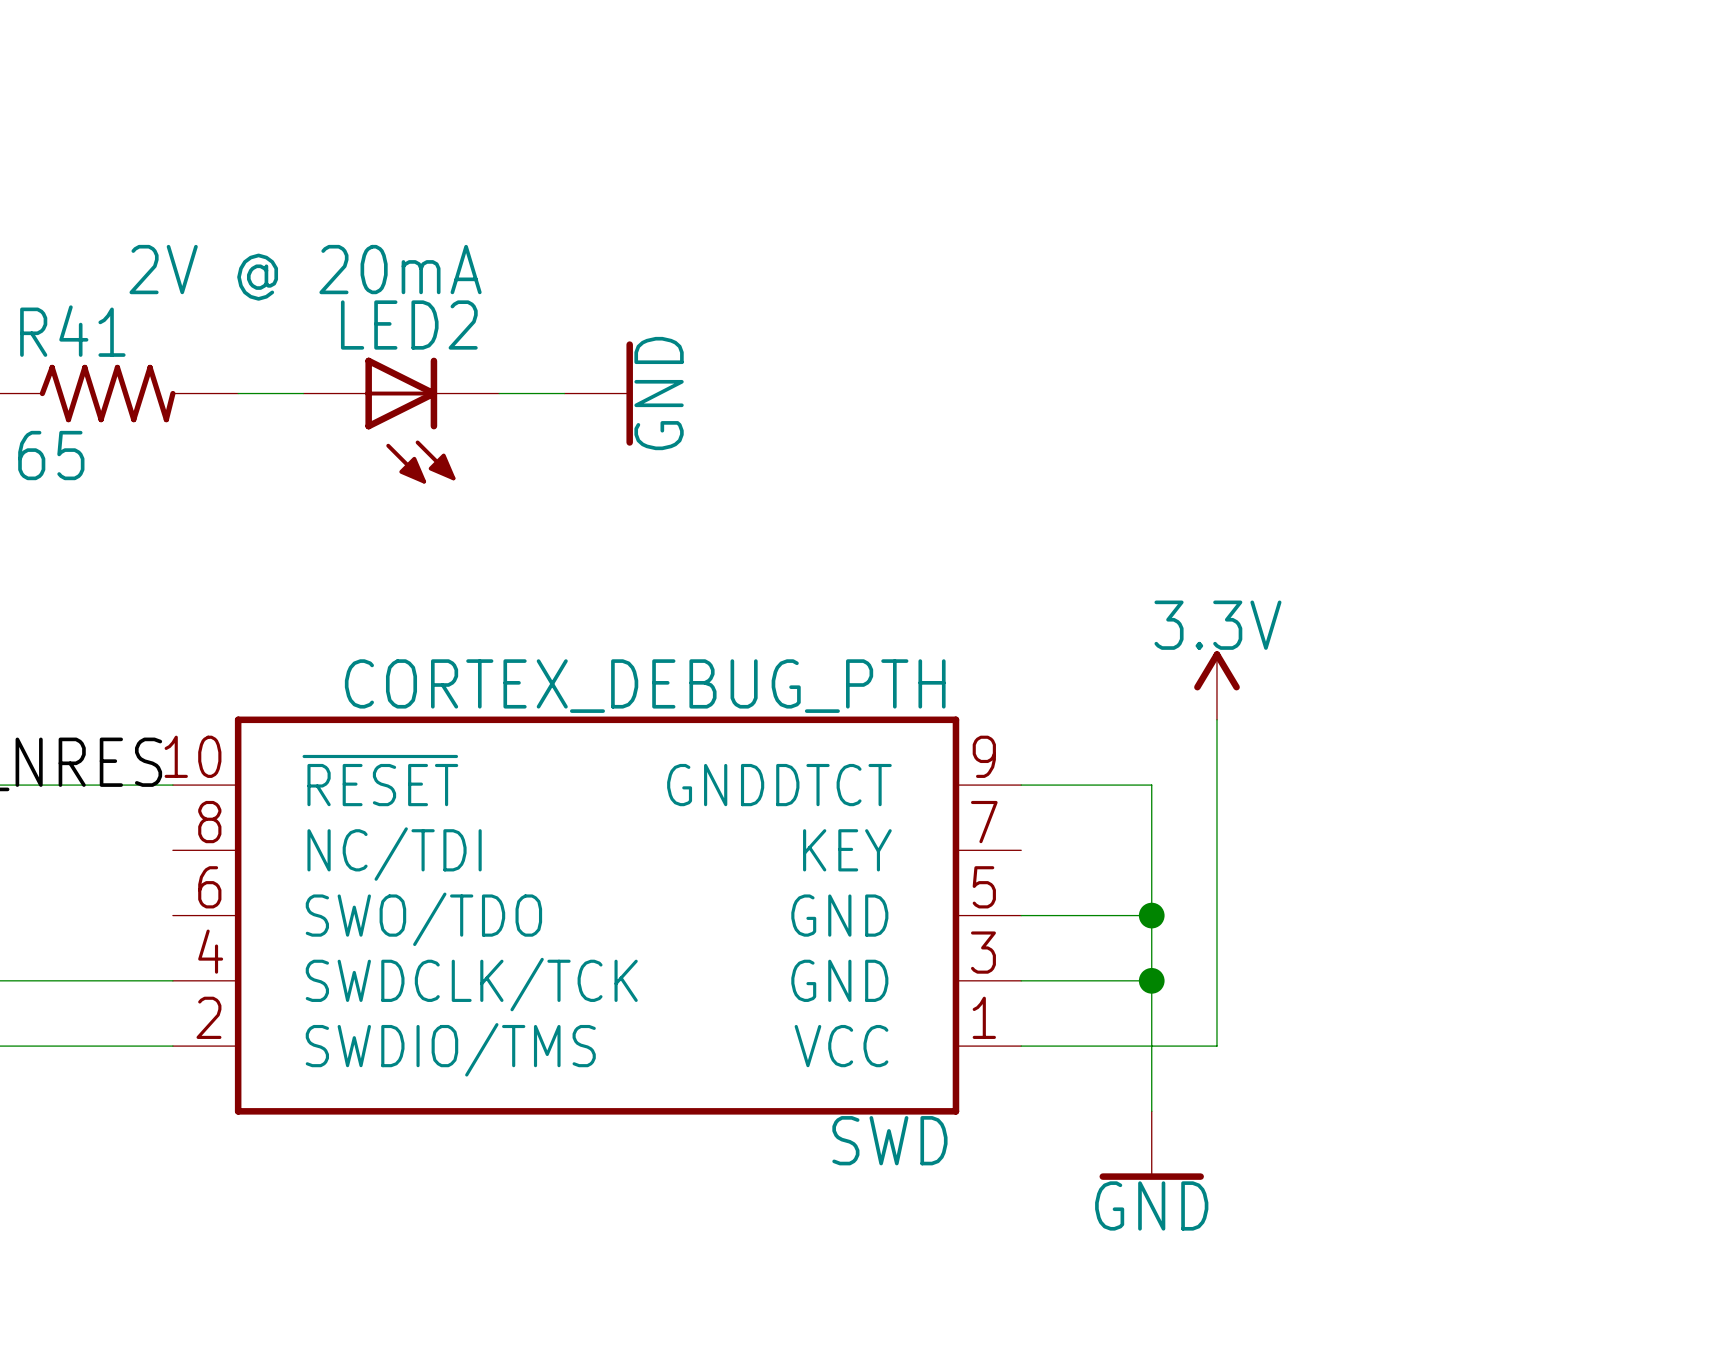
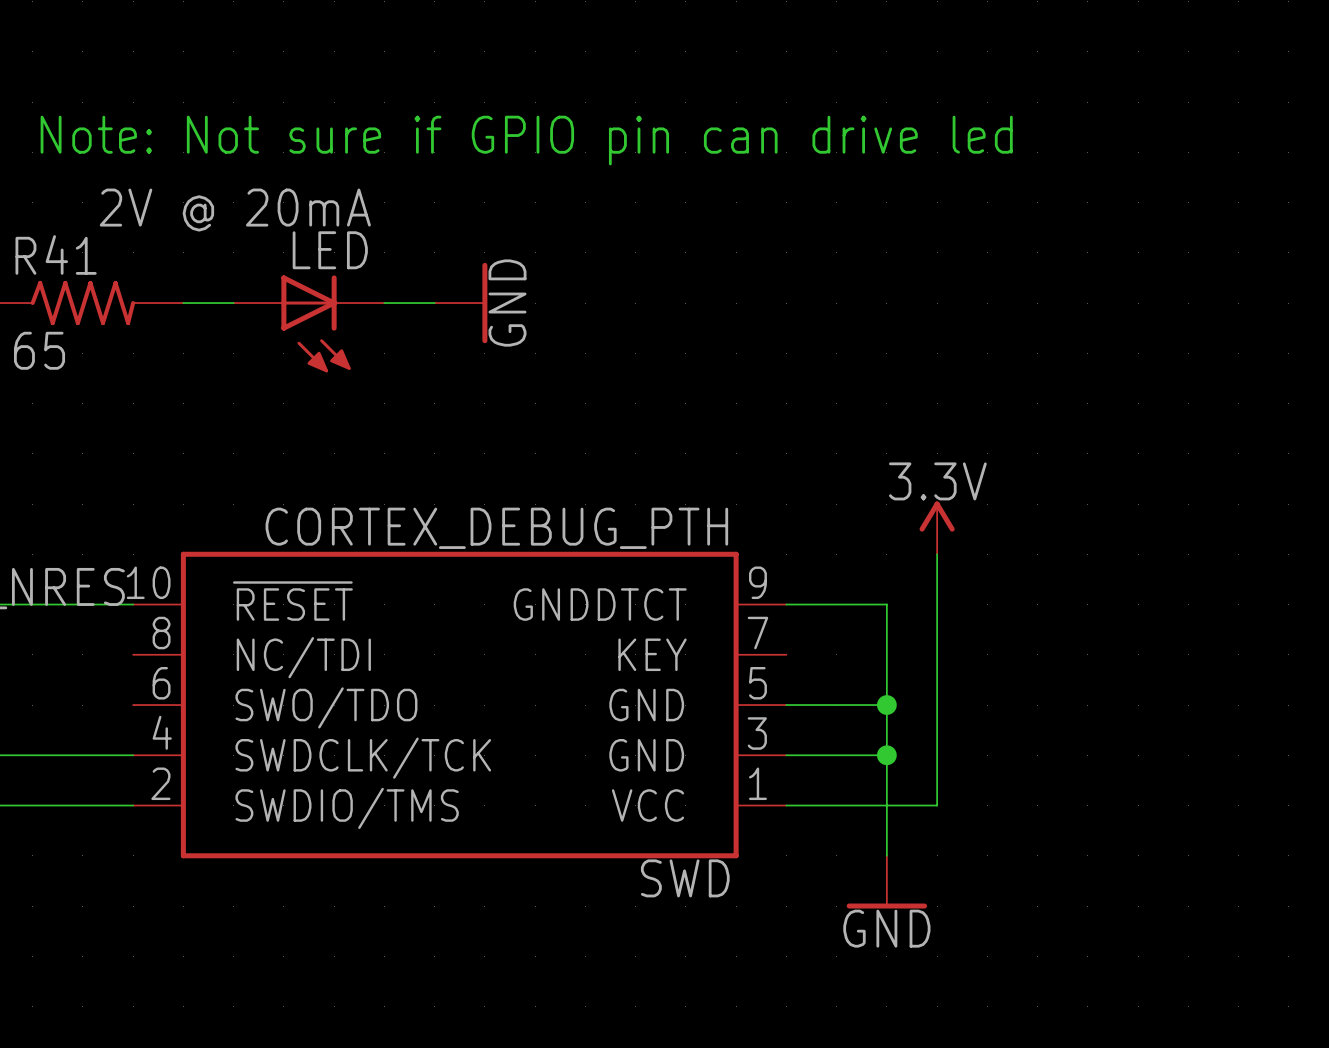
text: none -> Note: Not sure if GPIO pin can drive led (526, 140)
LED2 name: LED2 (409, 325) -> LED (330, 250)

